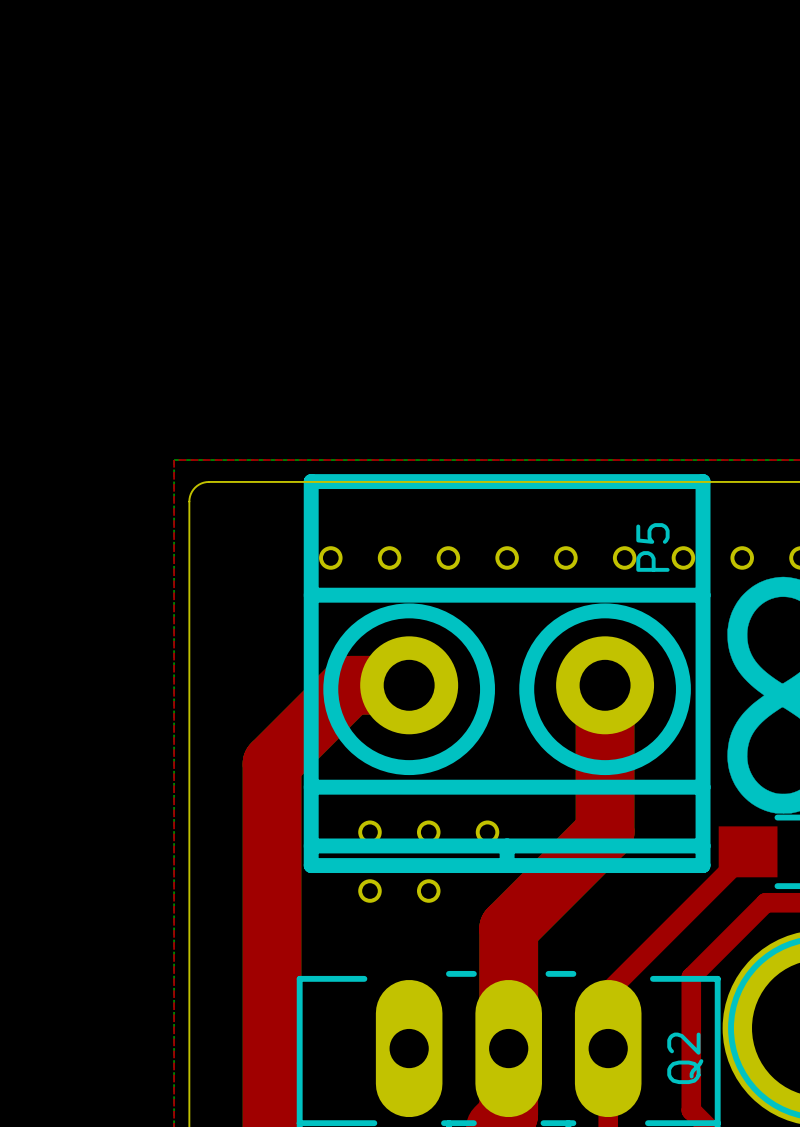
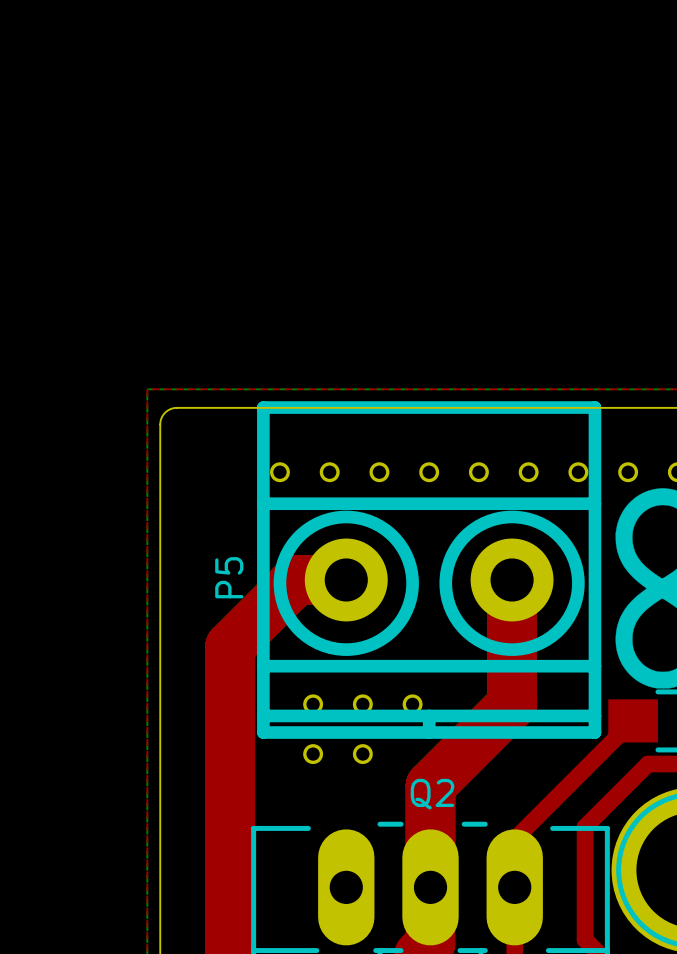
P5 name position: P5 (652, 547) -> P5 (229, 577)
Q2 name rotation: 0° (685, 1058) -> 90° clockwise (432, 794)
Q2 name position: Q2 (685, 1058) -> Q2 (432, 794)

